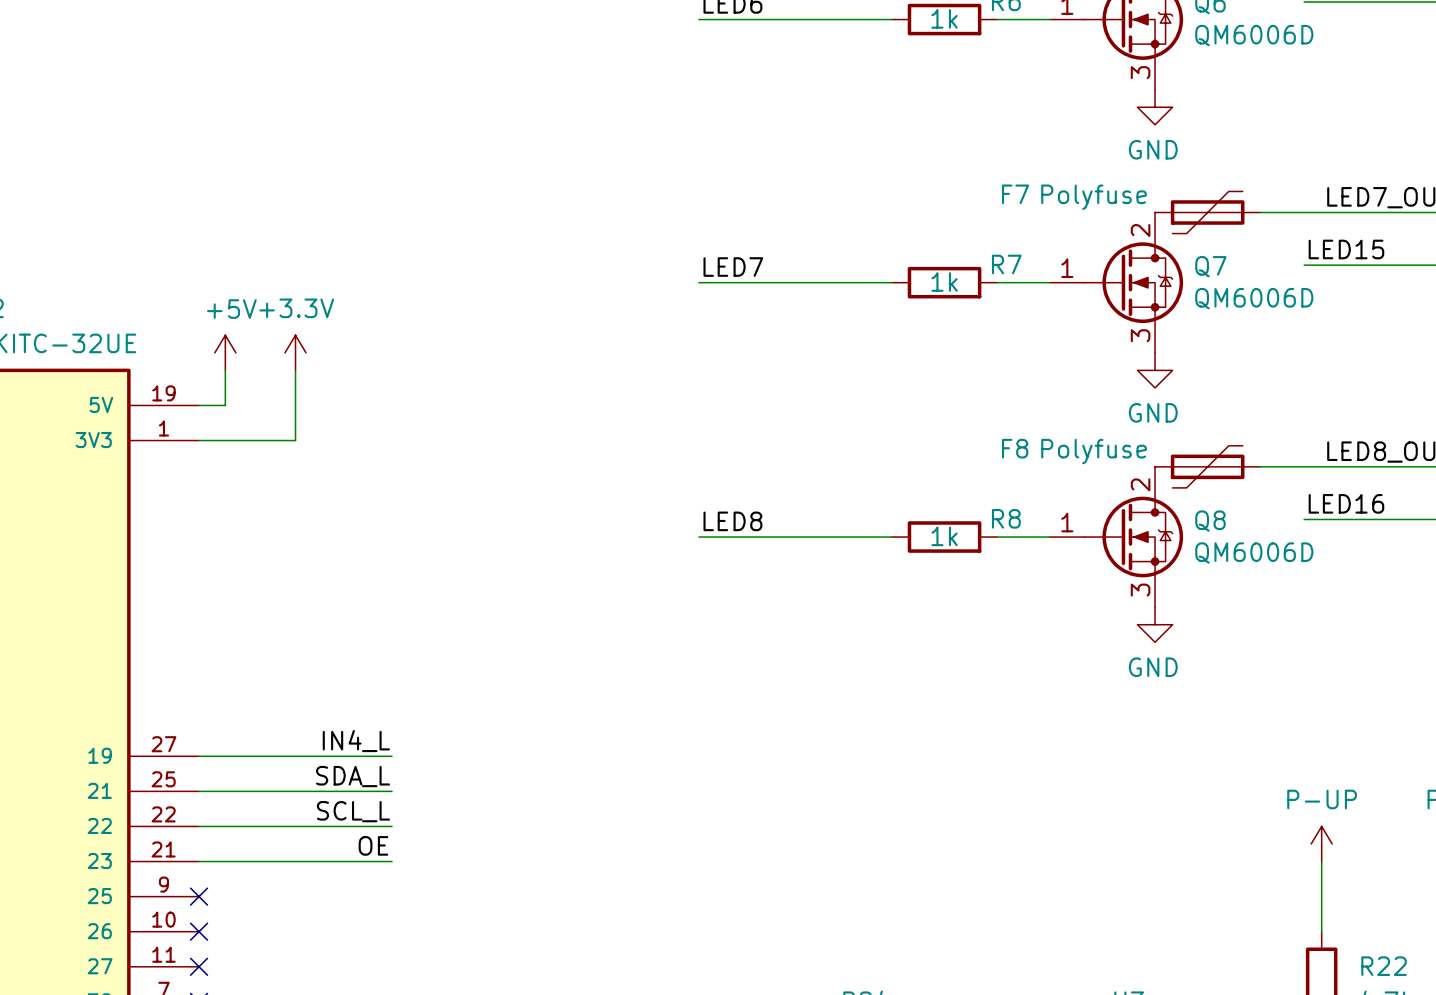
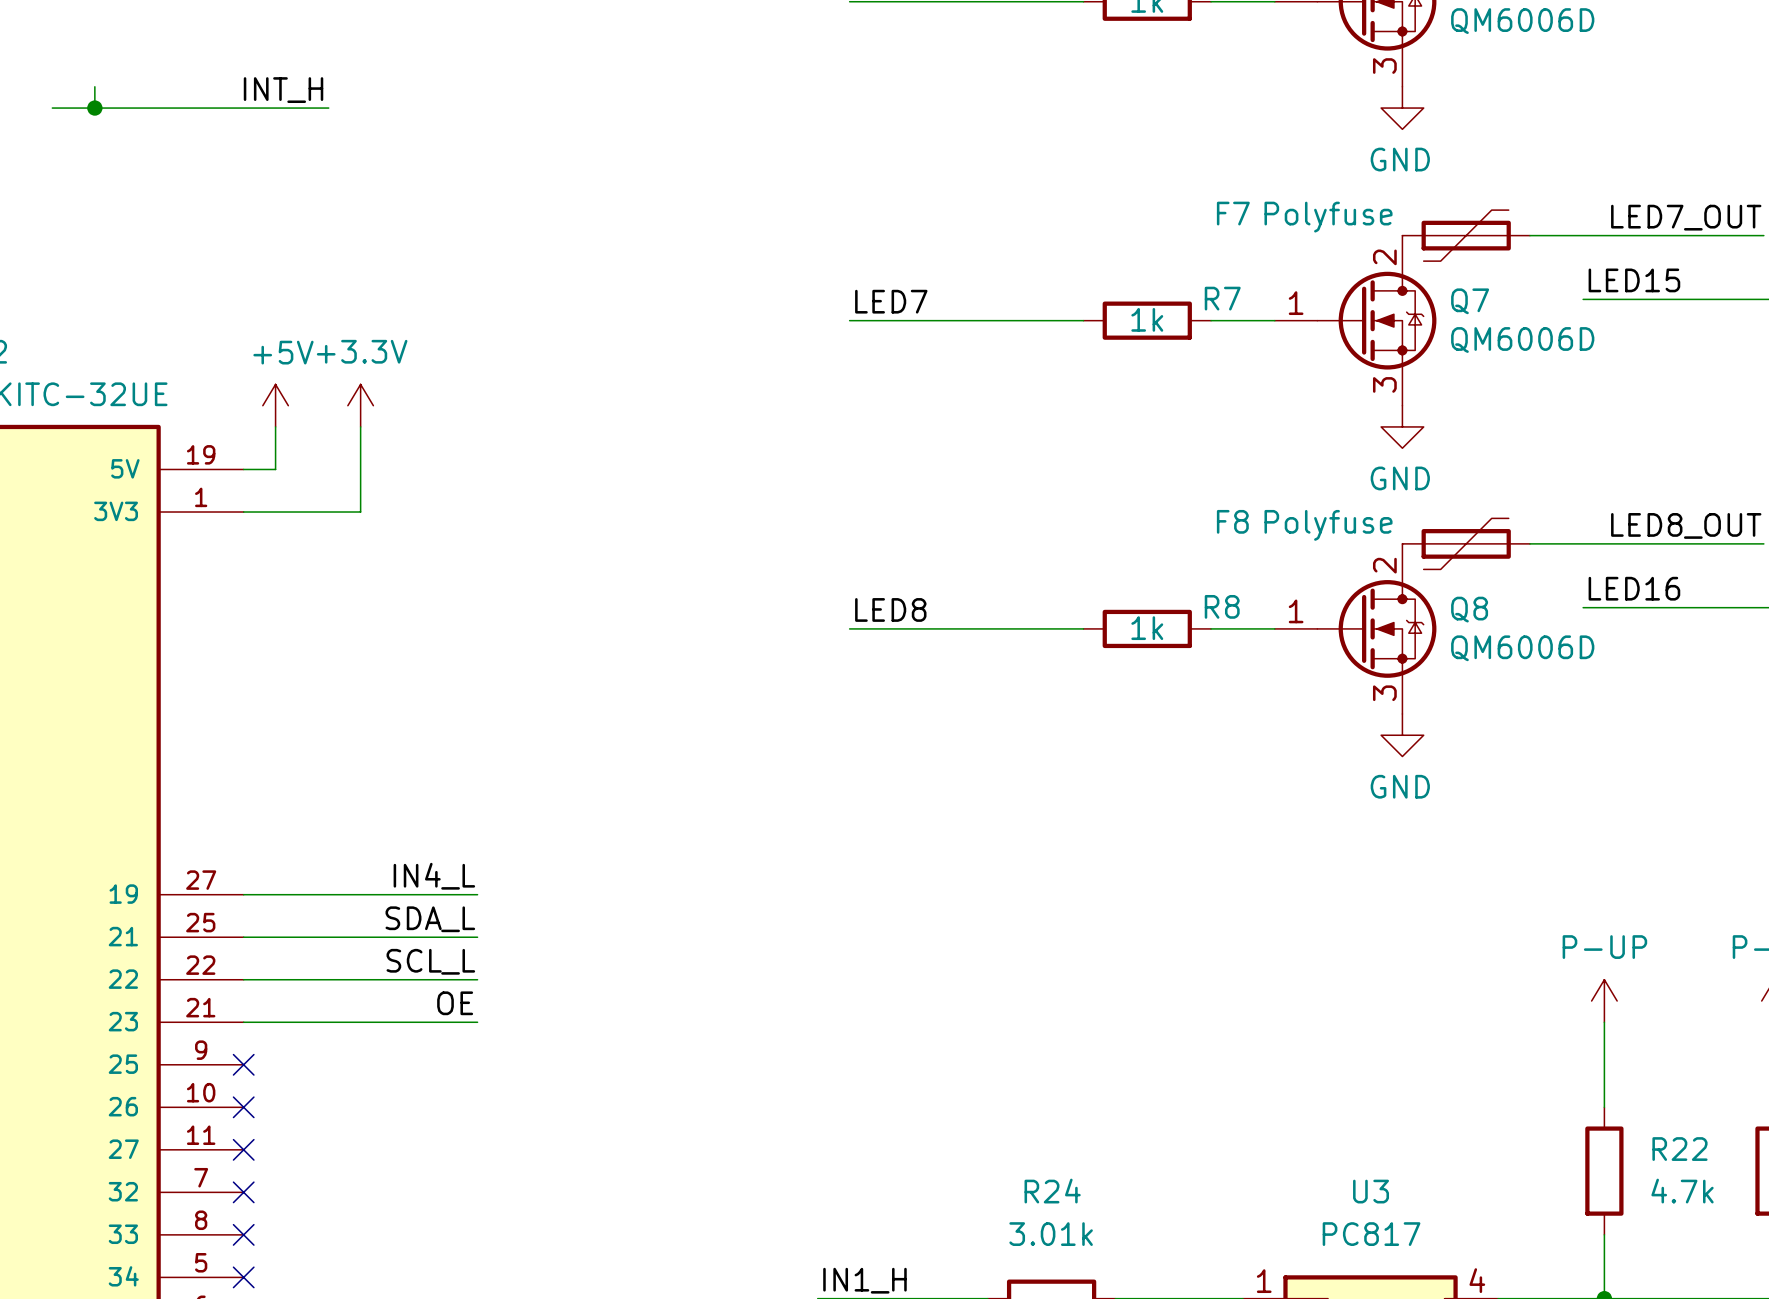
wire: none -> (94, 86) (94, 108)
label: none -> INT_H (283, 90)
wire: none -> (52, 108) (328, 108)
junction: none -> (94, 108)

